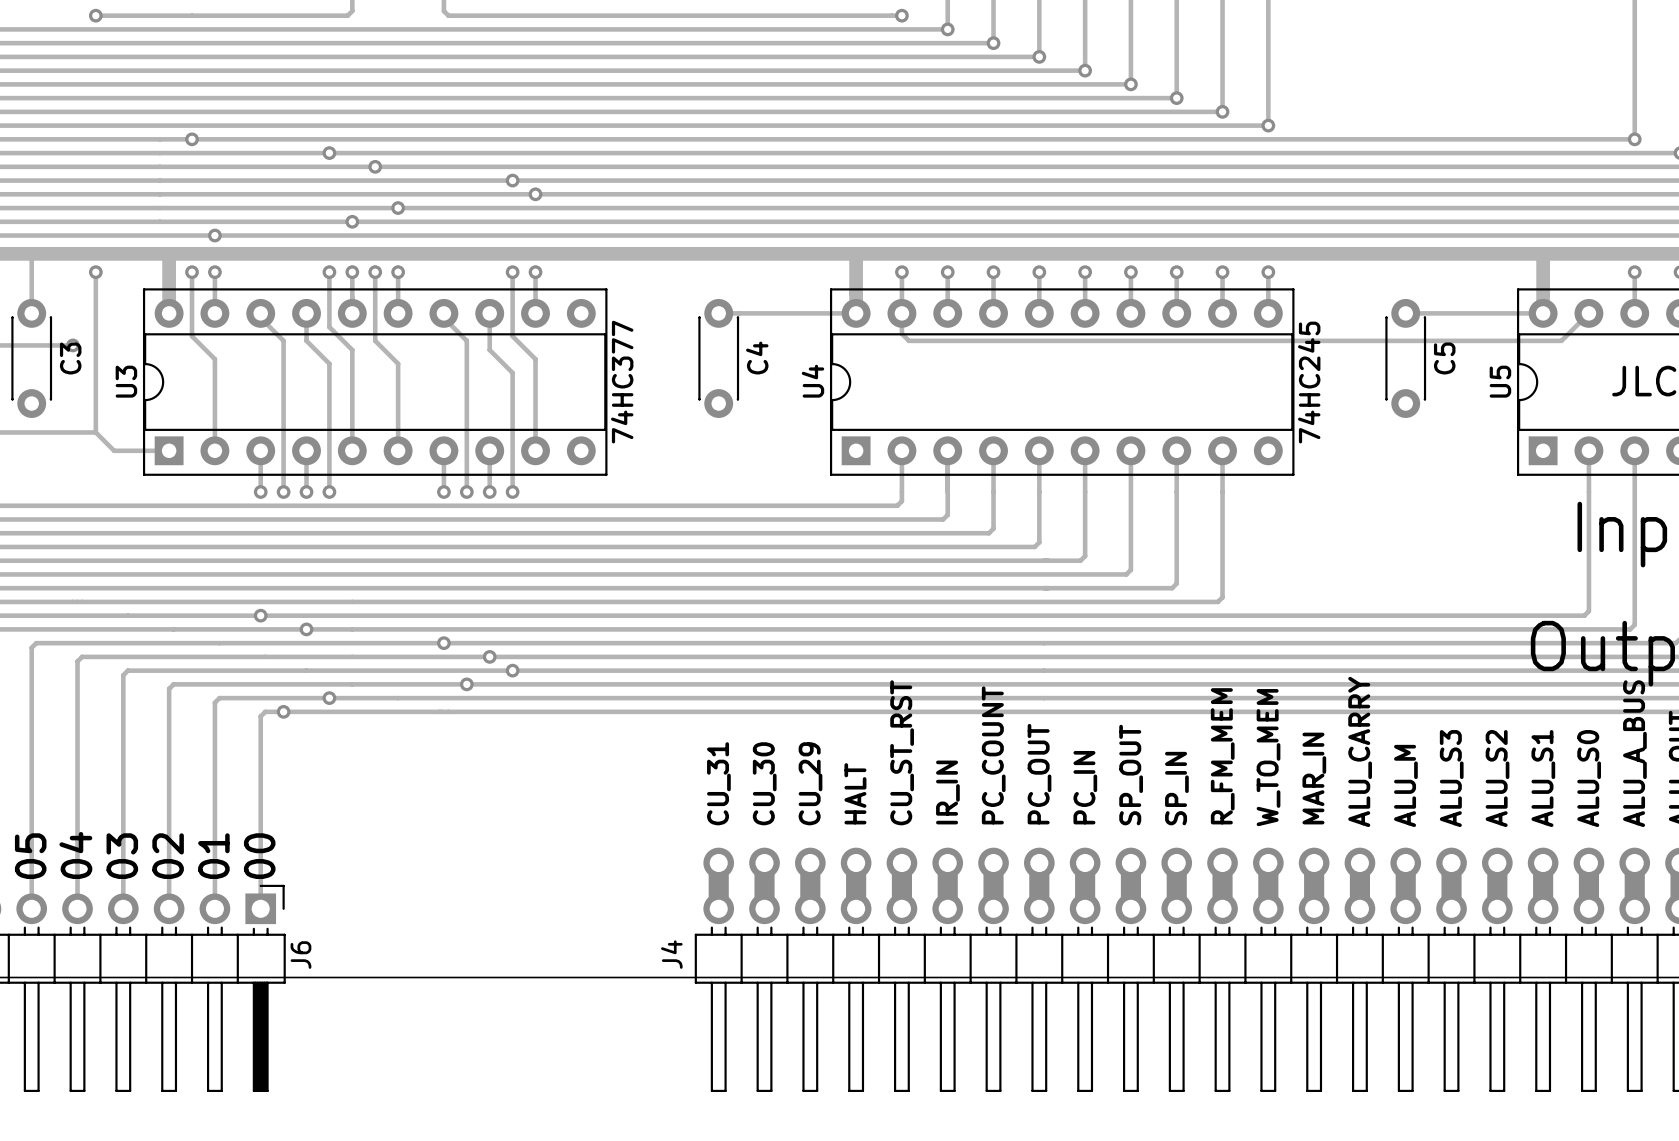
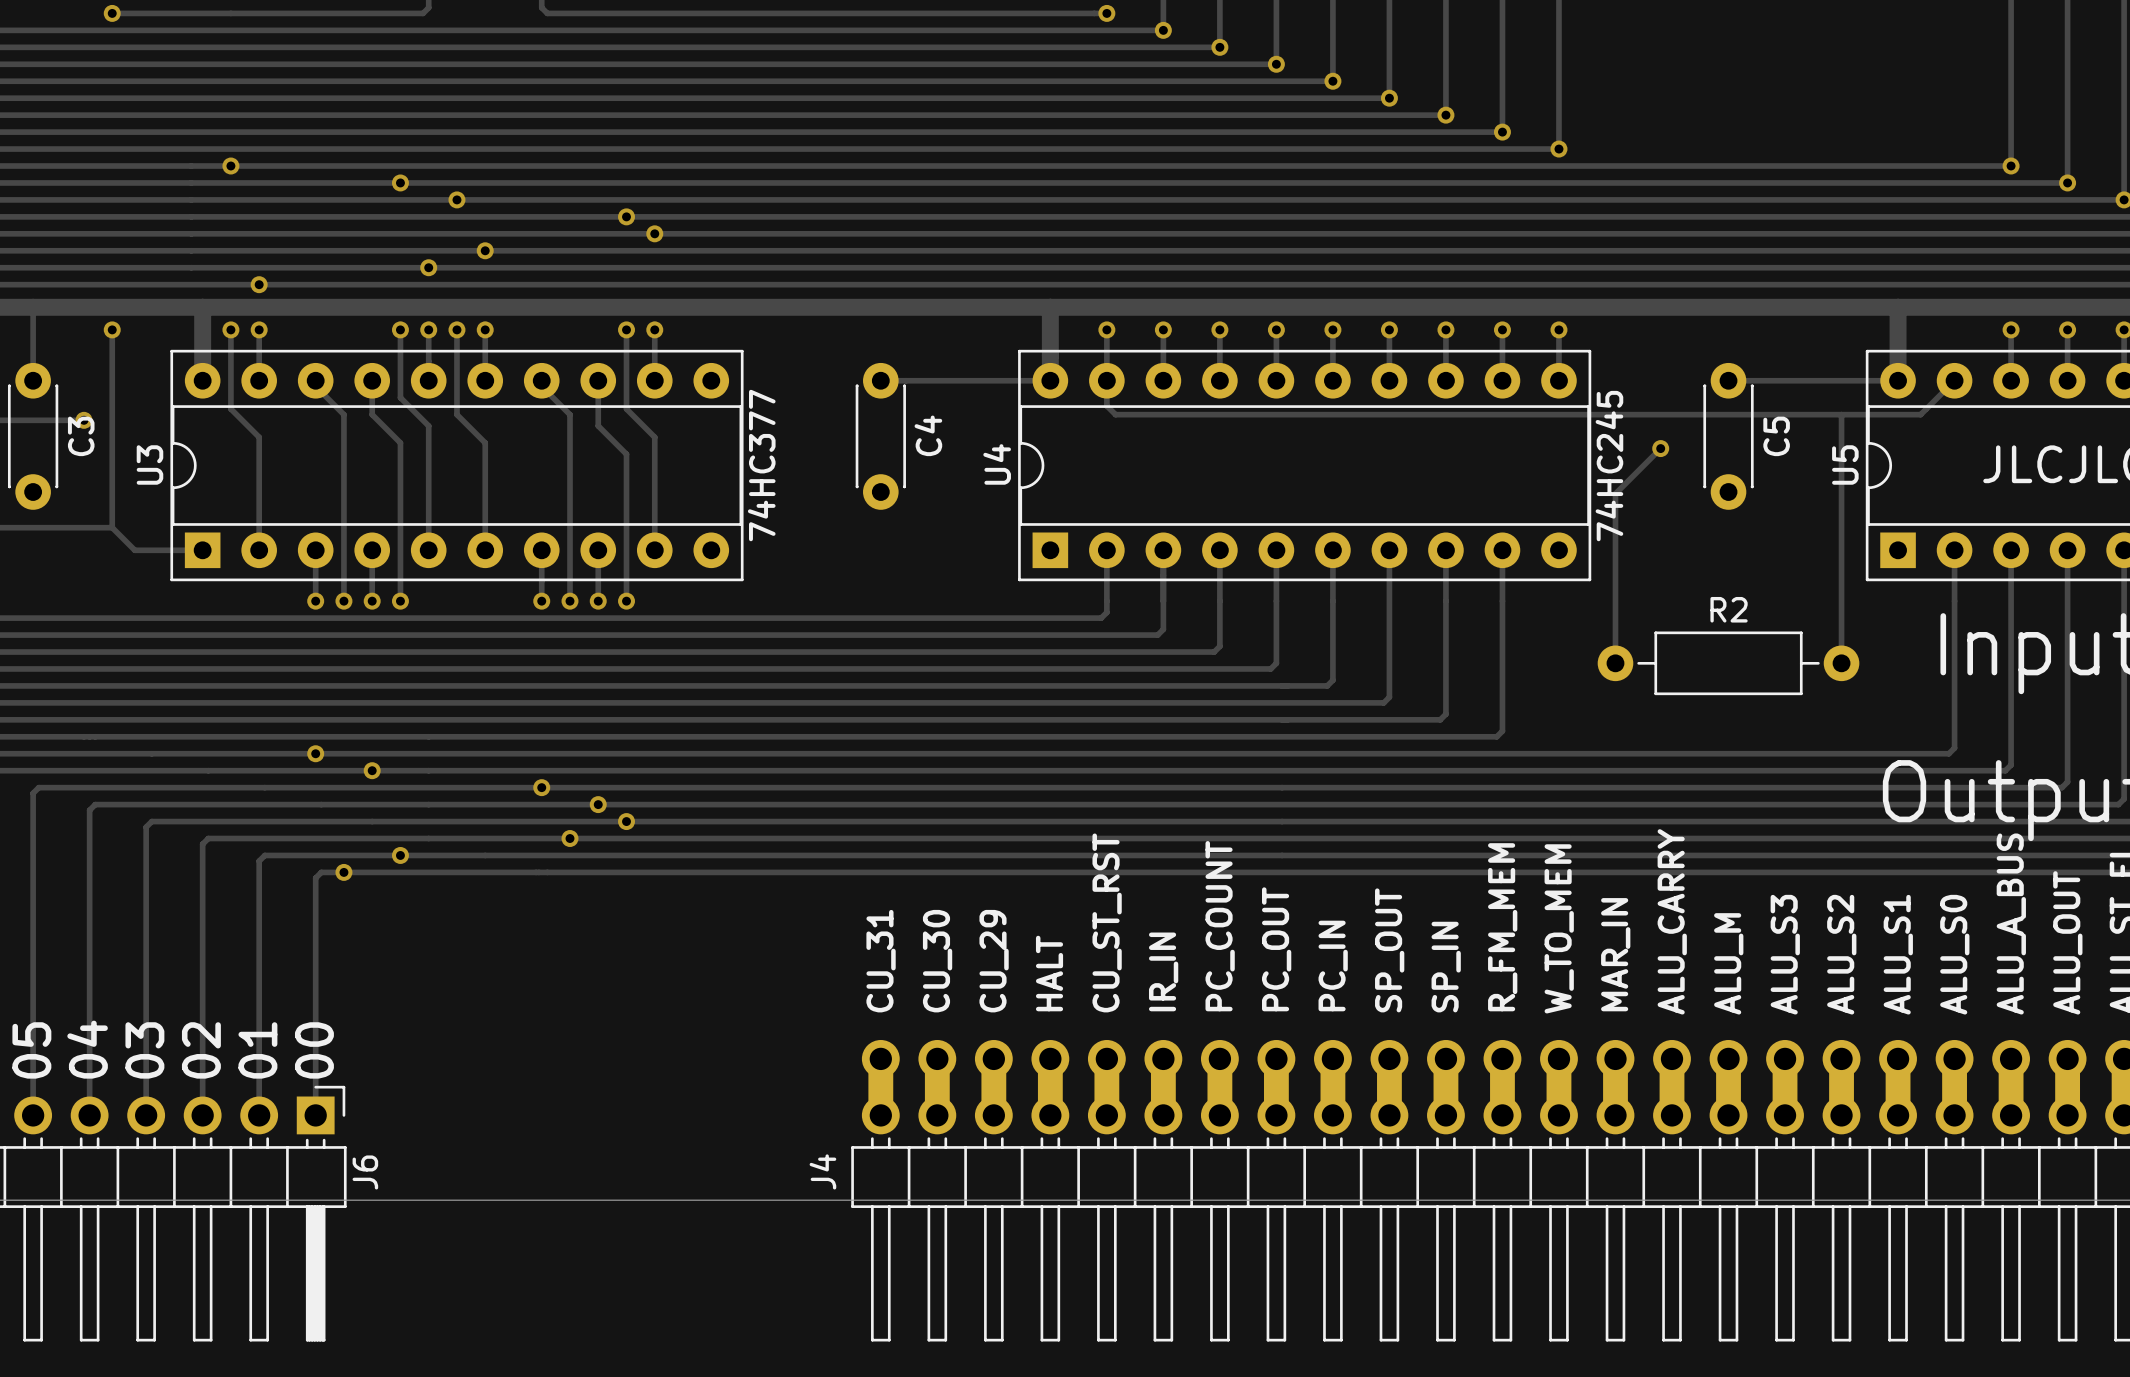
track: none -> (1841, 414) (1841, 663)
track: none -> (1660, 448) (1615, 493) (1615, 663)
via: none -> (1660, 448)
R2: none -> (1728, 663)

